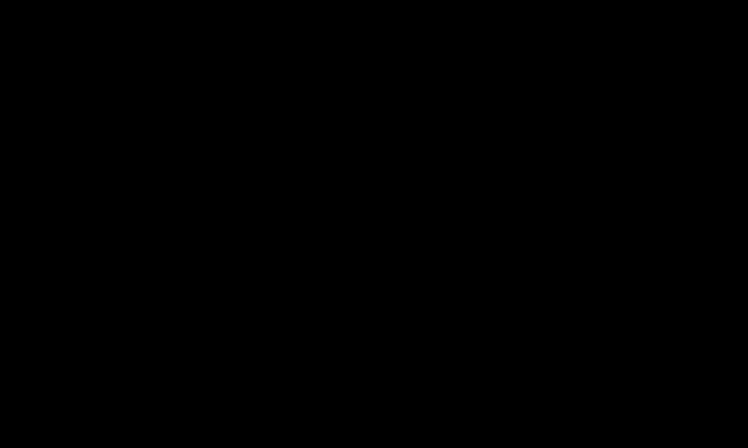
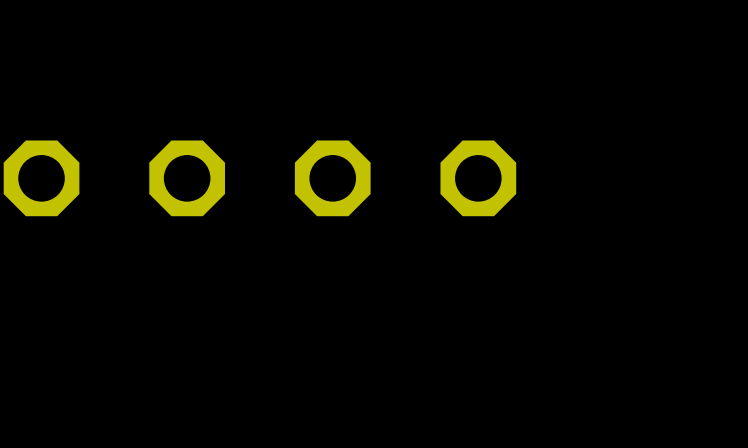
part: none -> (114, 178)
part: none -> (405, 178)

